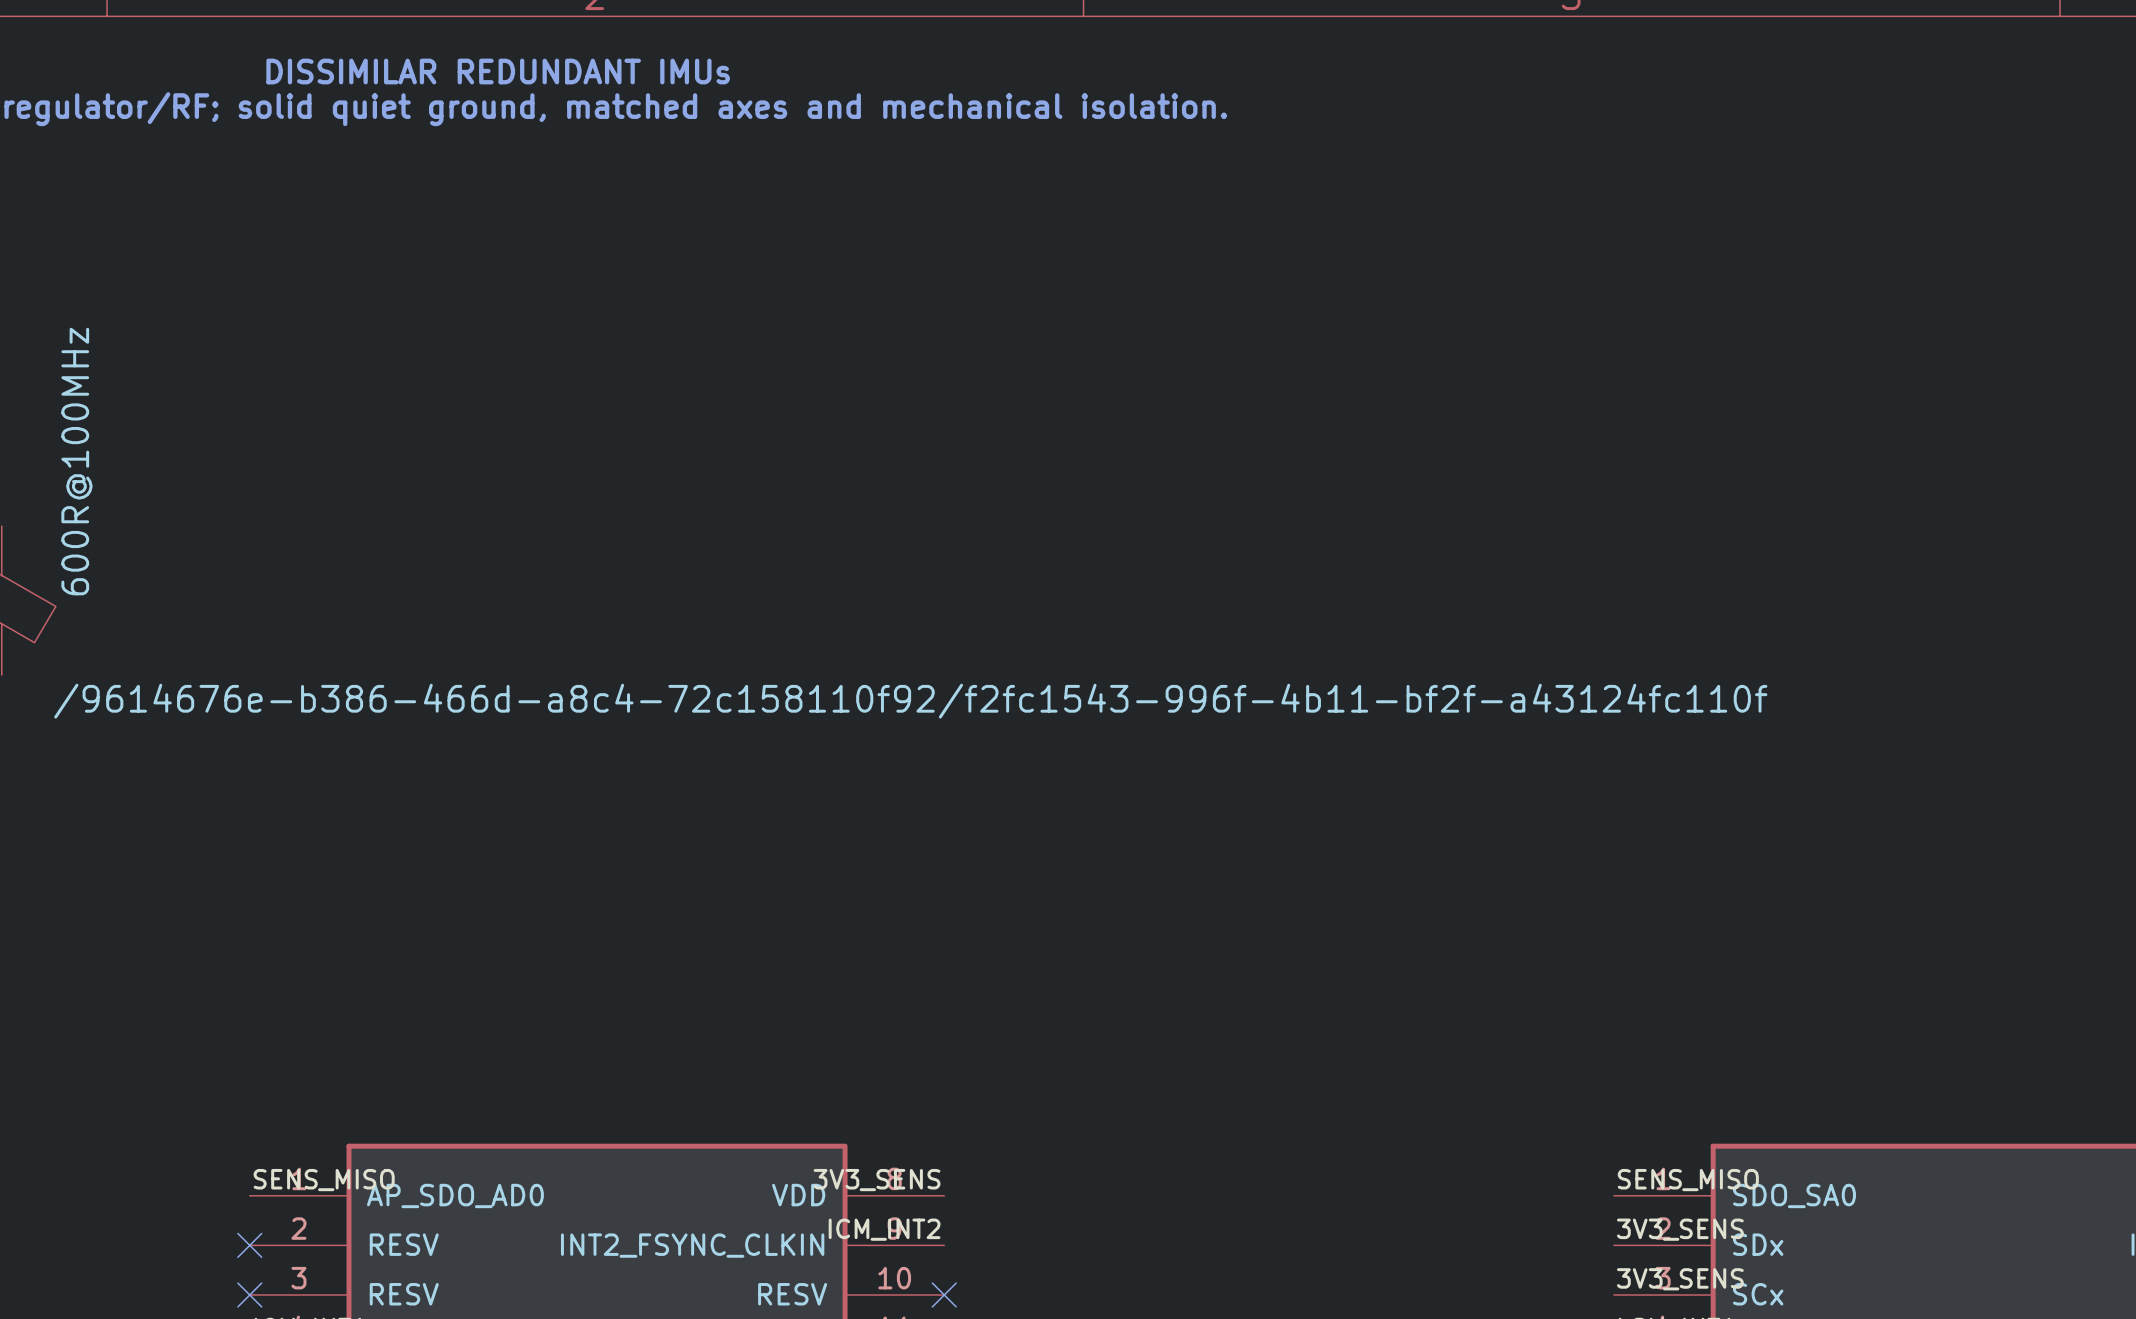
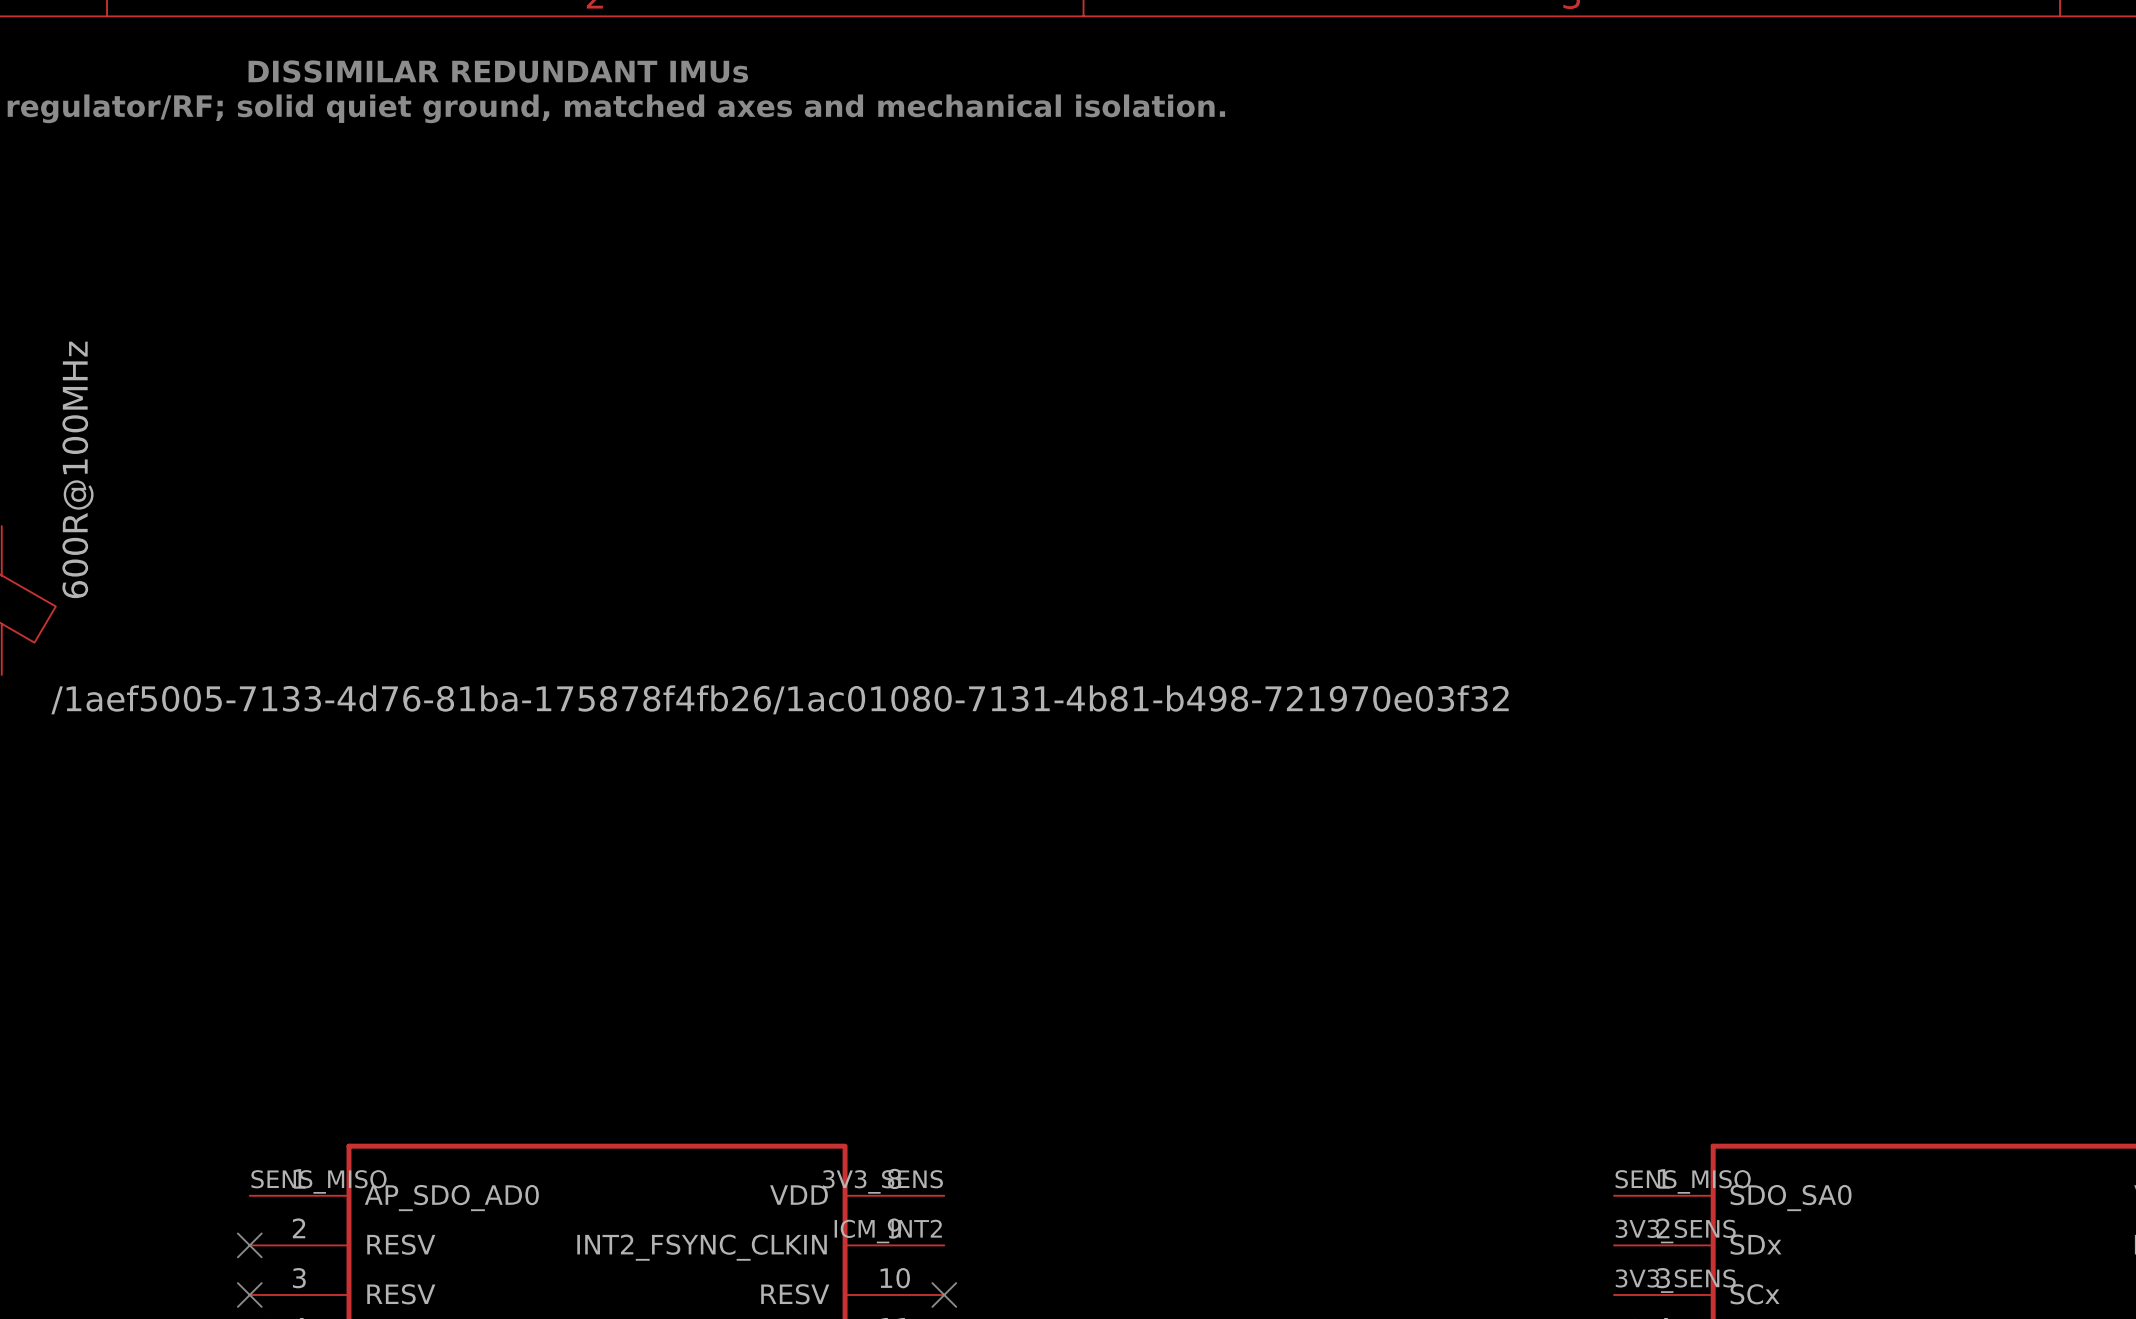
part text: /9614676e-b386-466d-a8c4-72c158110f92/f2fc1543-996f-4b11-bf2f-a43124fc110f (910, 701) -> /1aef5005-7133-4d76-81ba-175878f4fb26/1ac01080-7131-4b81-b498-721970e03f32 (780, 699)

